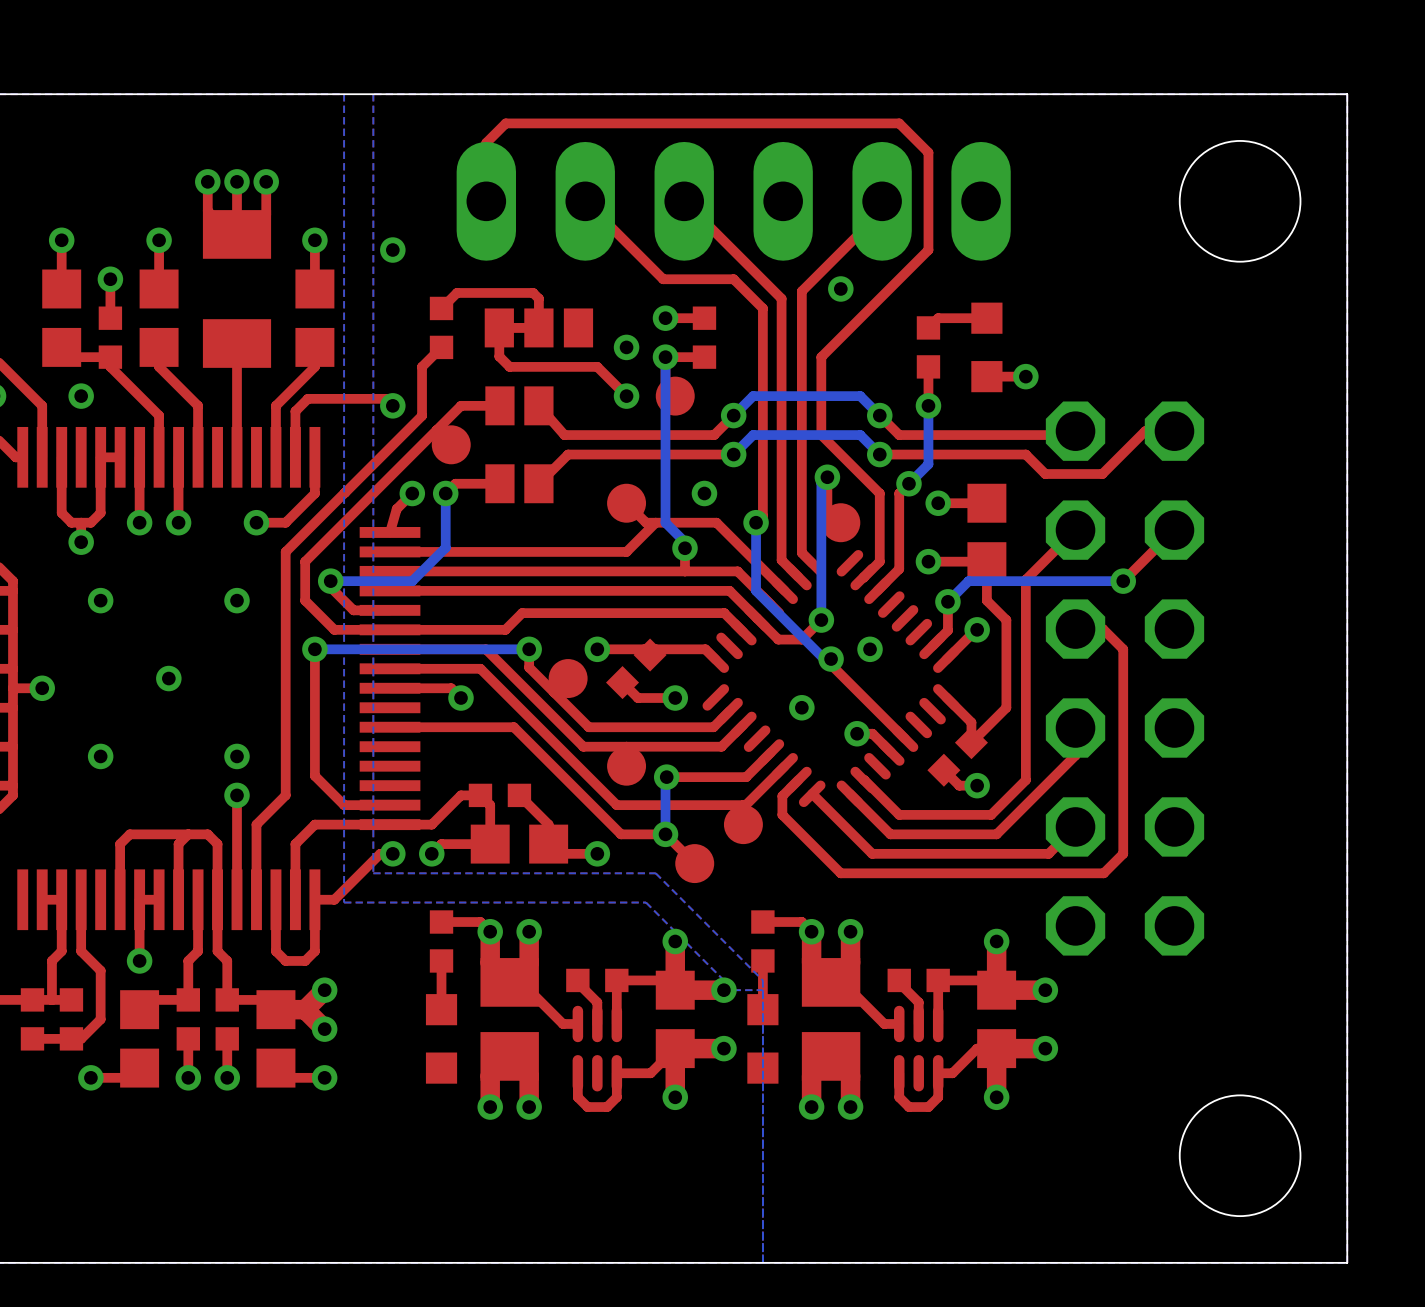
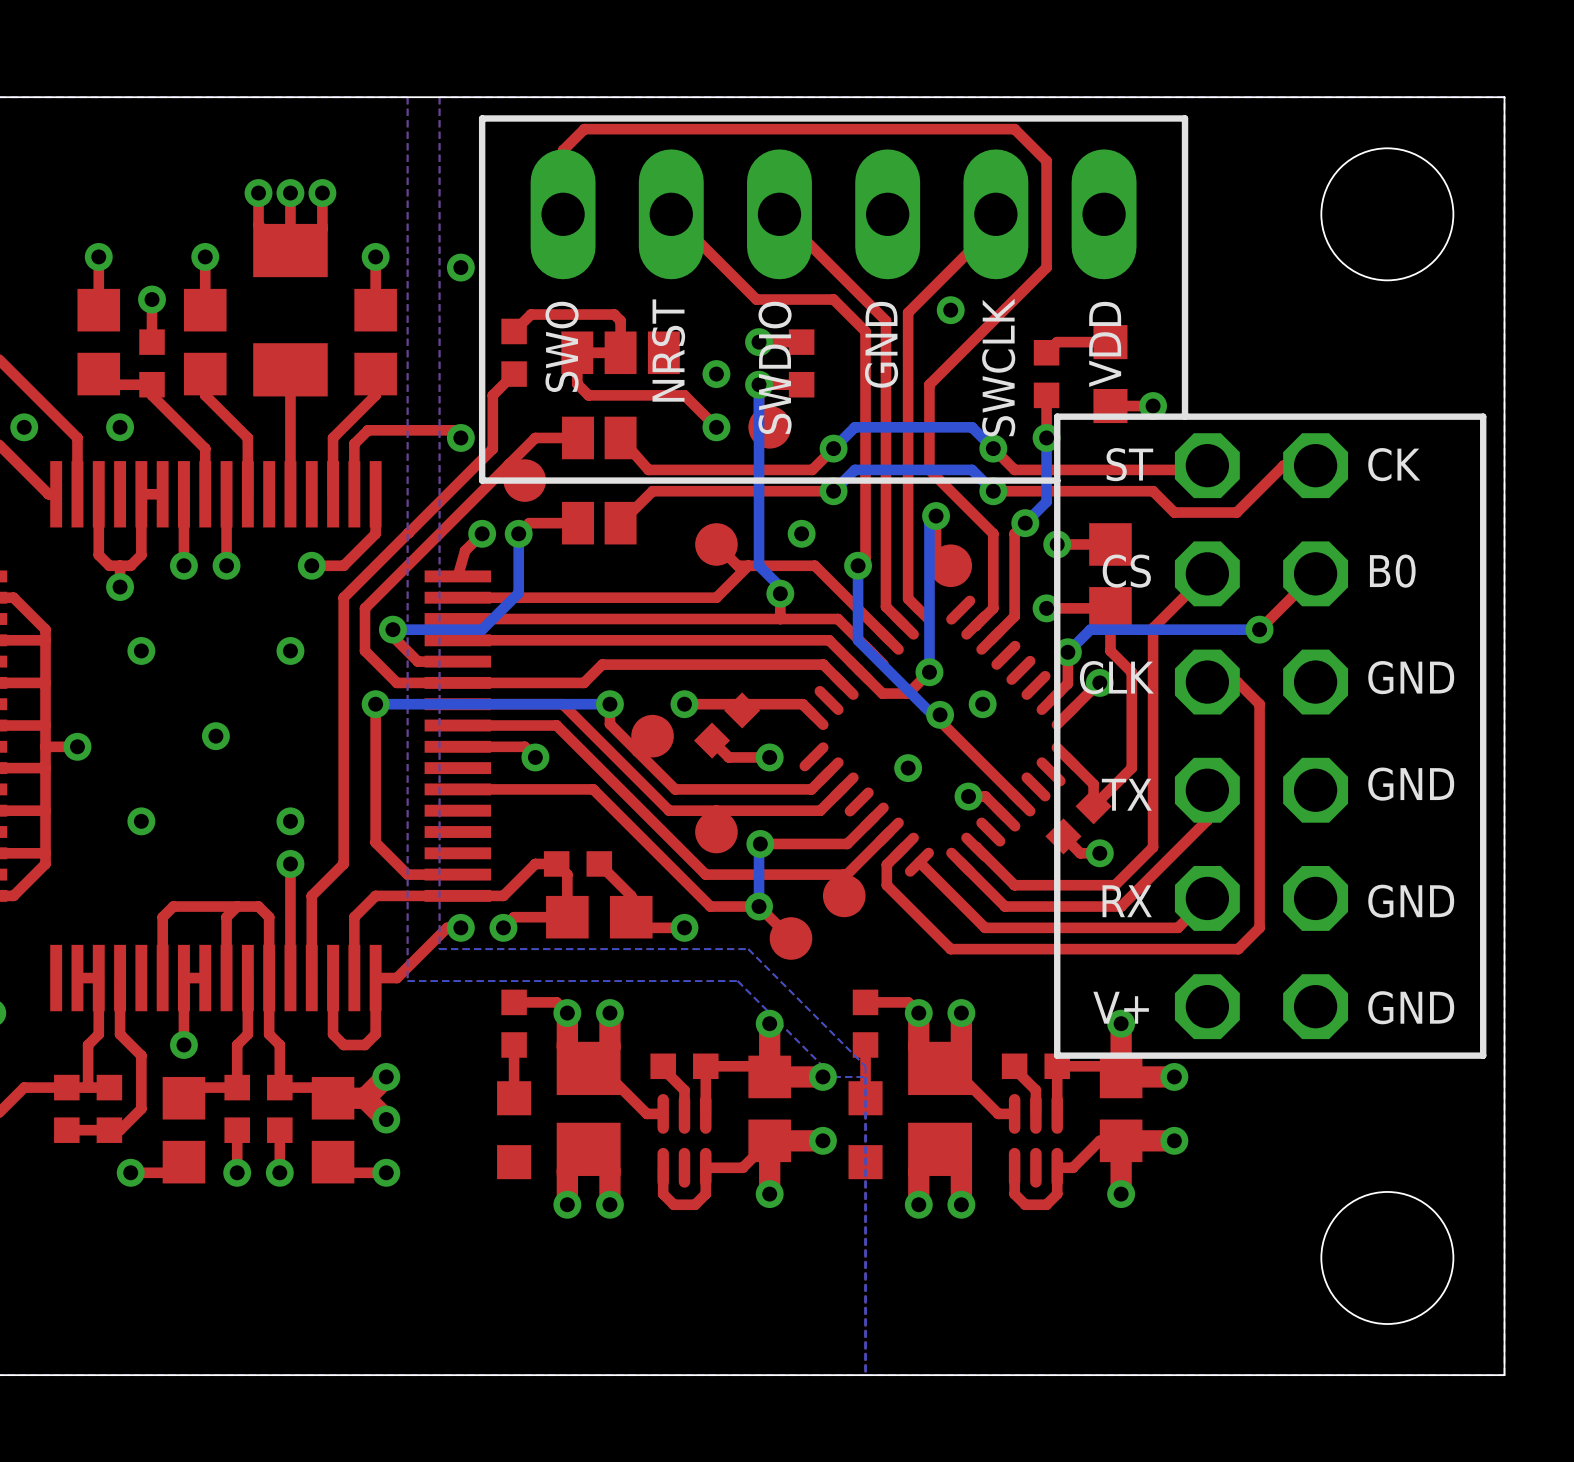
text: none -> GND (881, 344)
text: none -> VDD (1105, 344)
text: none -> SWO (562, 346)
text: none -> NRST (668, 350)
text: none -> SWDIO (775, 367)
text: none -> SWCLK (998, 367)
line: none -> (1185, 416) (1185, 118) (482, 118) (482, 480) (1057, 480)
line: none -> (1483, 416) (1483, 1055) (1057, 1055) (1057, 416) (1483, 416)
text: none -> ST (1129, 464)
text: none -> CK (1394, 464)
text: none -> CS (1126, 571)
text: none -> B0 (1392, 571)
text: none -> CLK (1116, 677)
text: none -> GND (1411, 677)
text: none -> GND (1411, 784)
text: none -> TX (1126, 794)
text: none -> RX (1127, 901)
text: none -> GND (1411, 901)
text: none -> V+ (1121, 1007)
text: none -> GND (1411, 1007)

